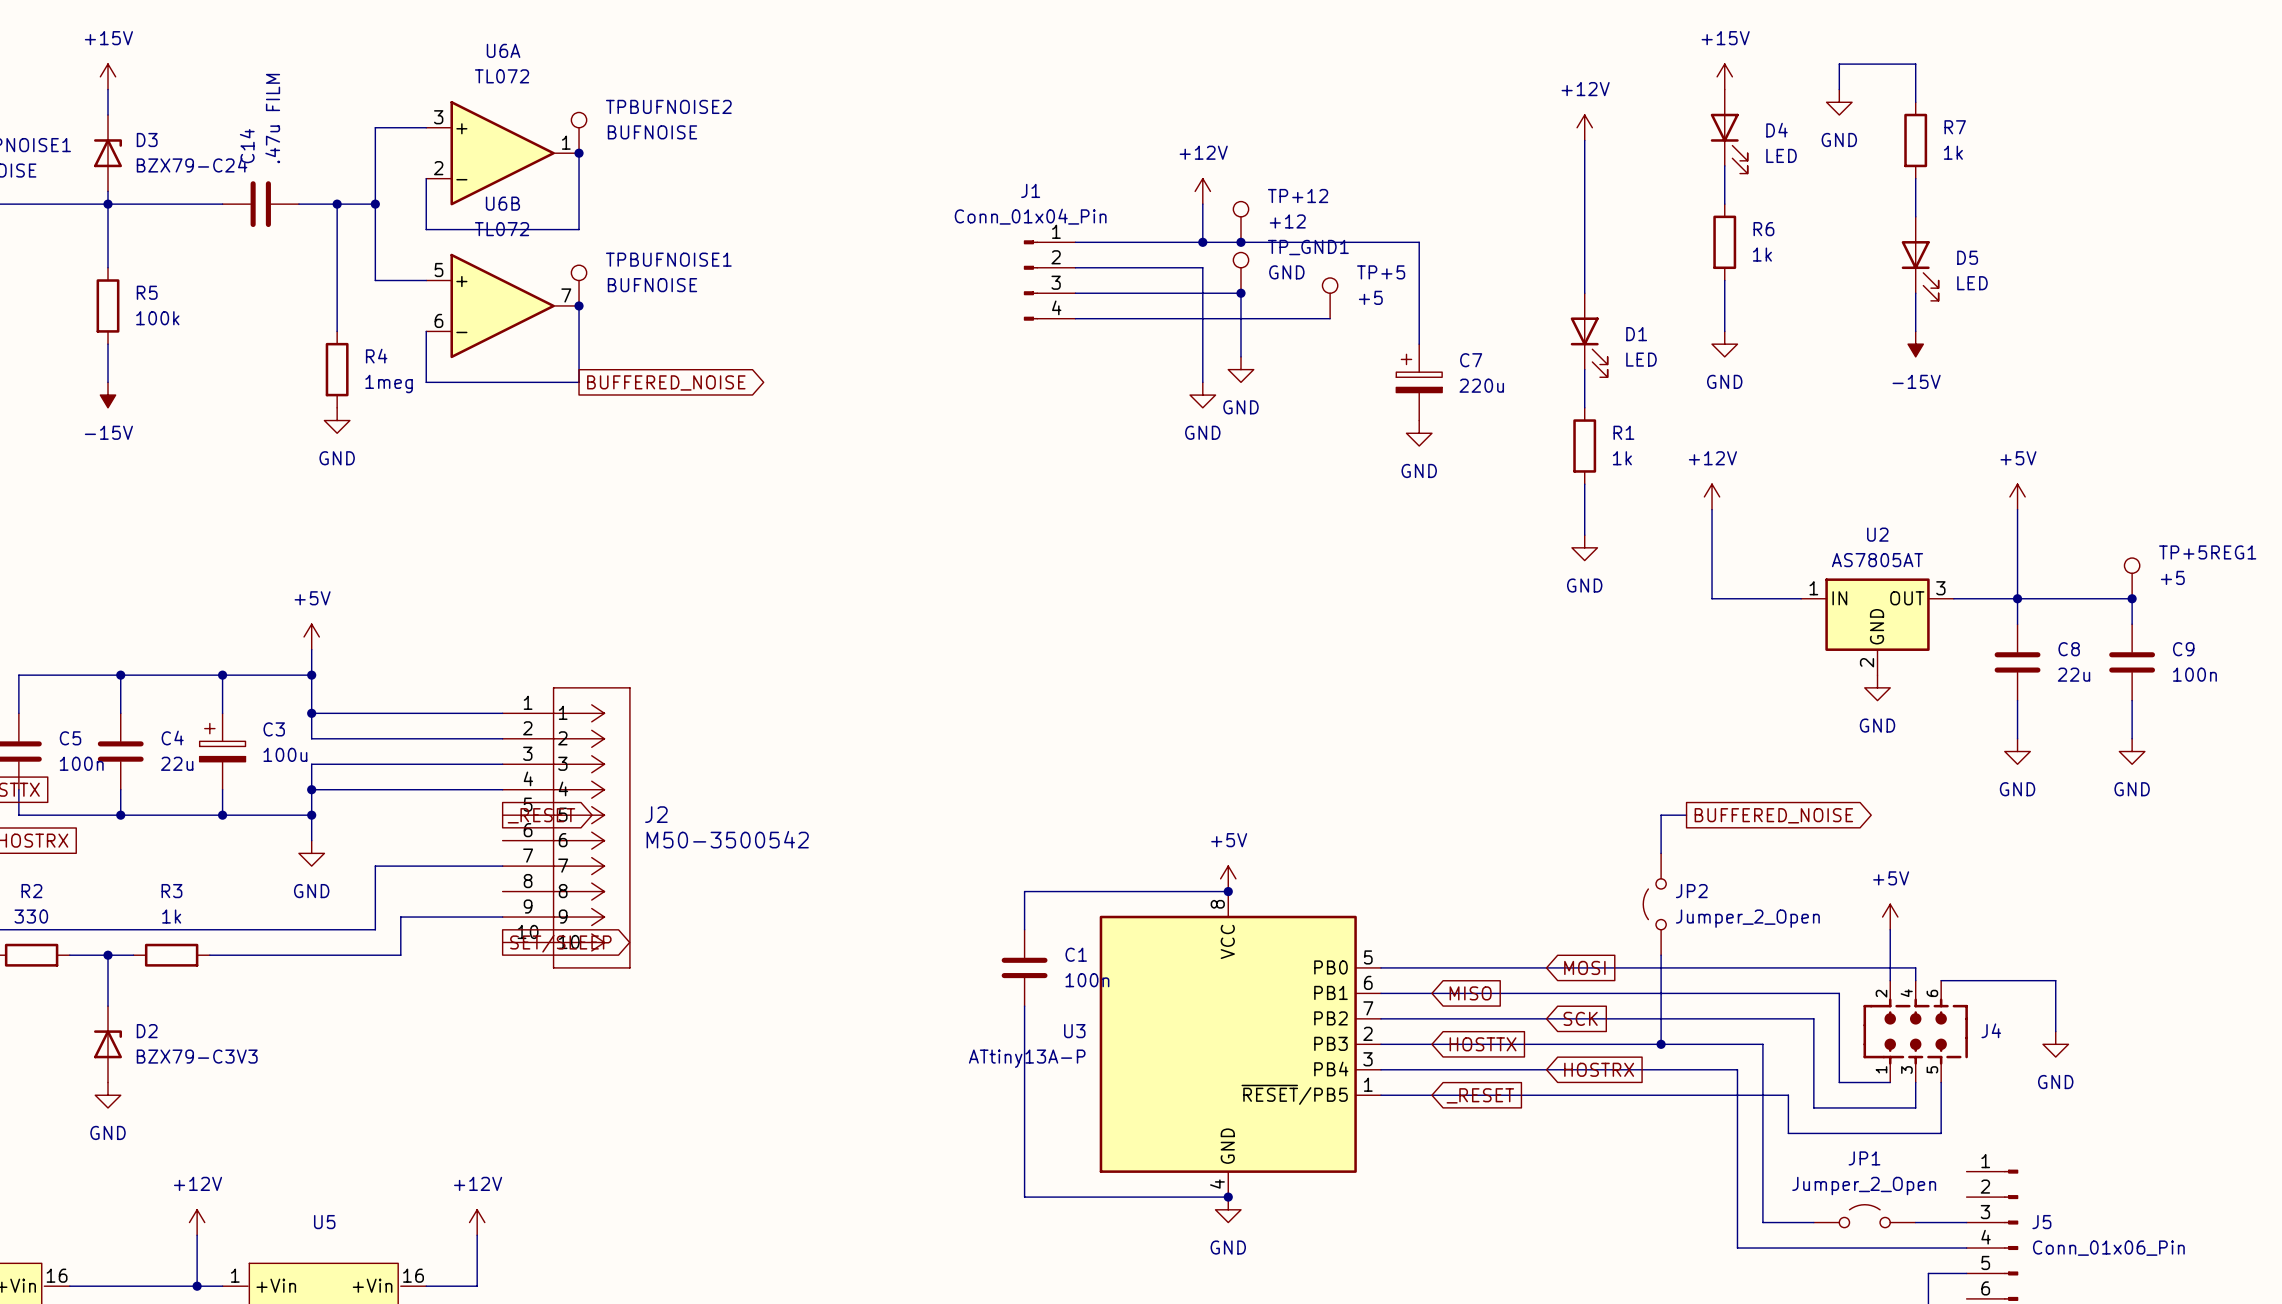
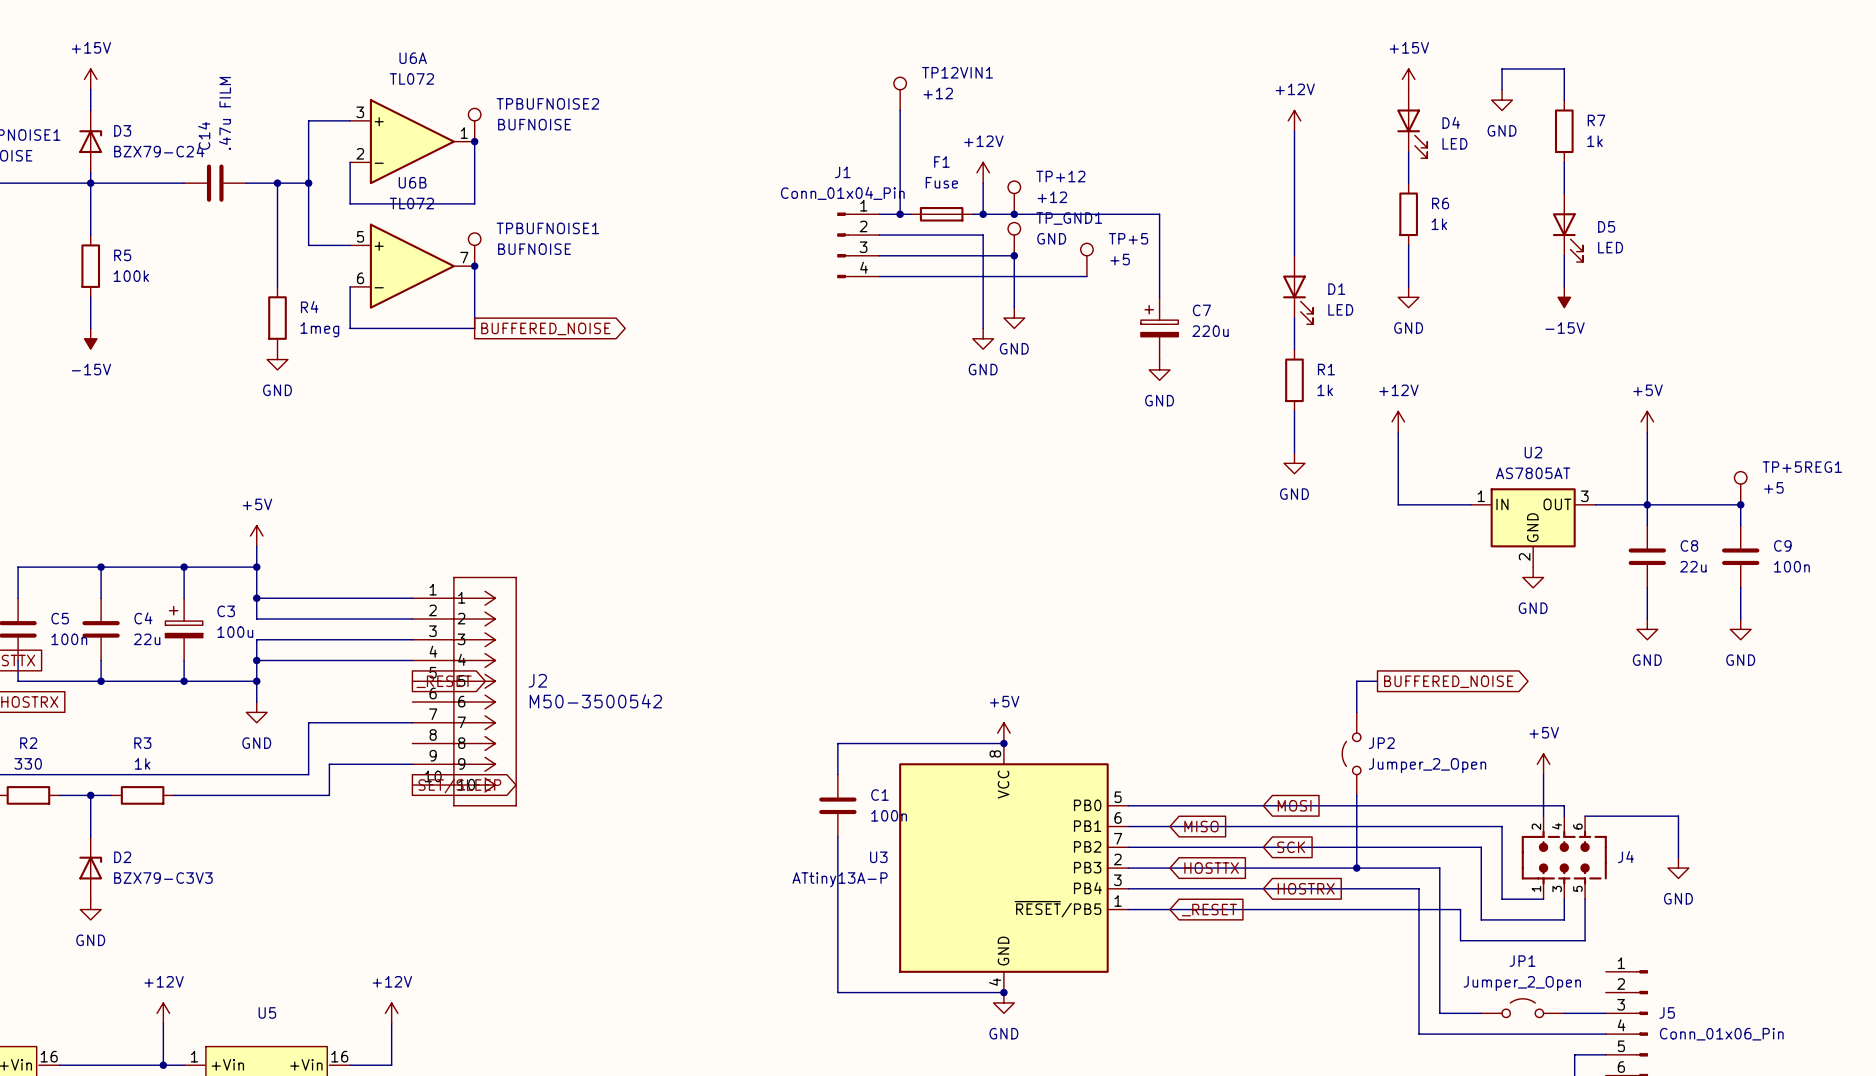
TP12VIN1: none -> +12 (900, 93)
wire: none -> (900, 110) (900, 214)
junction: none -> (900, 214)
F1: none -> Fuse (941, 214)

